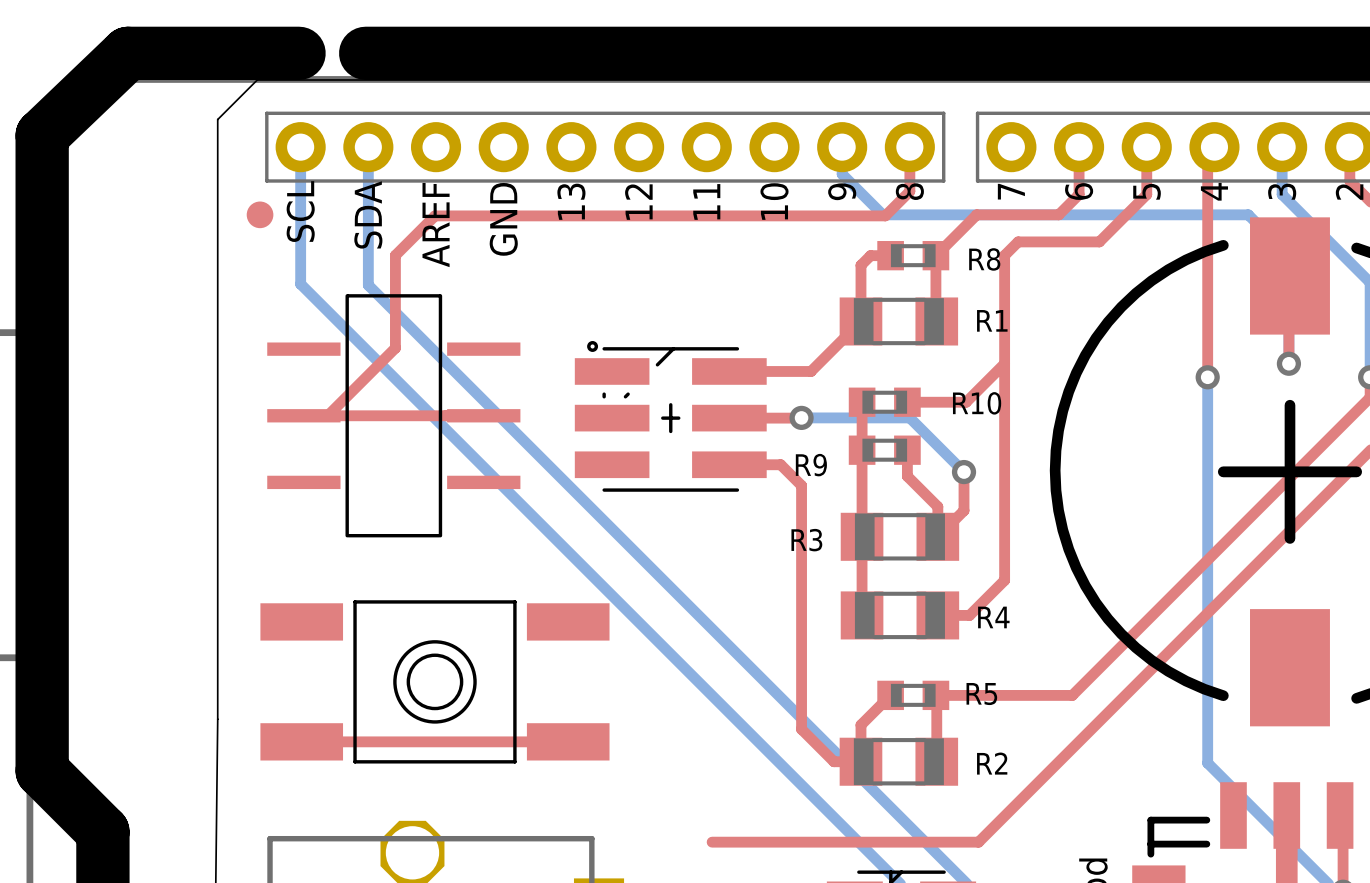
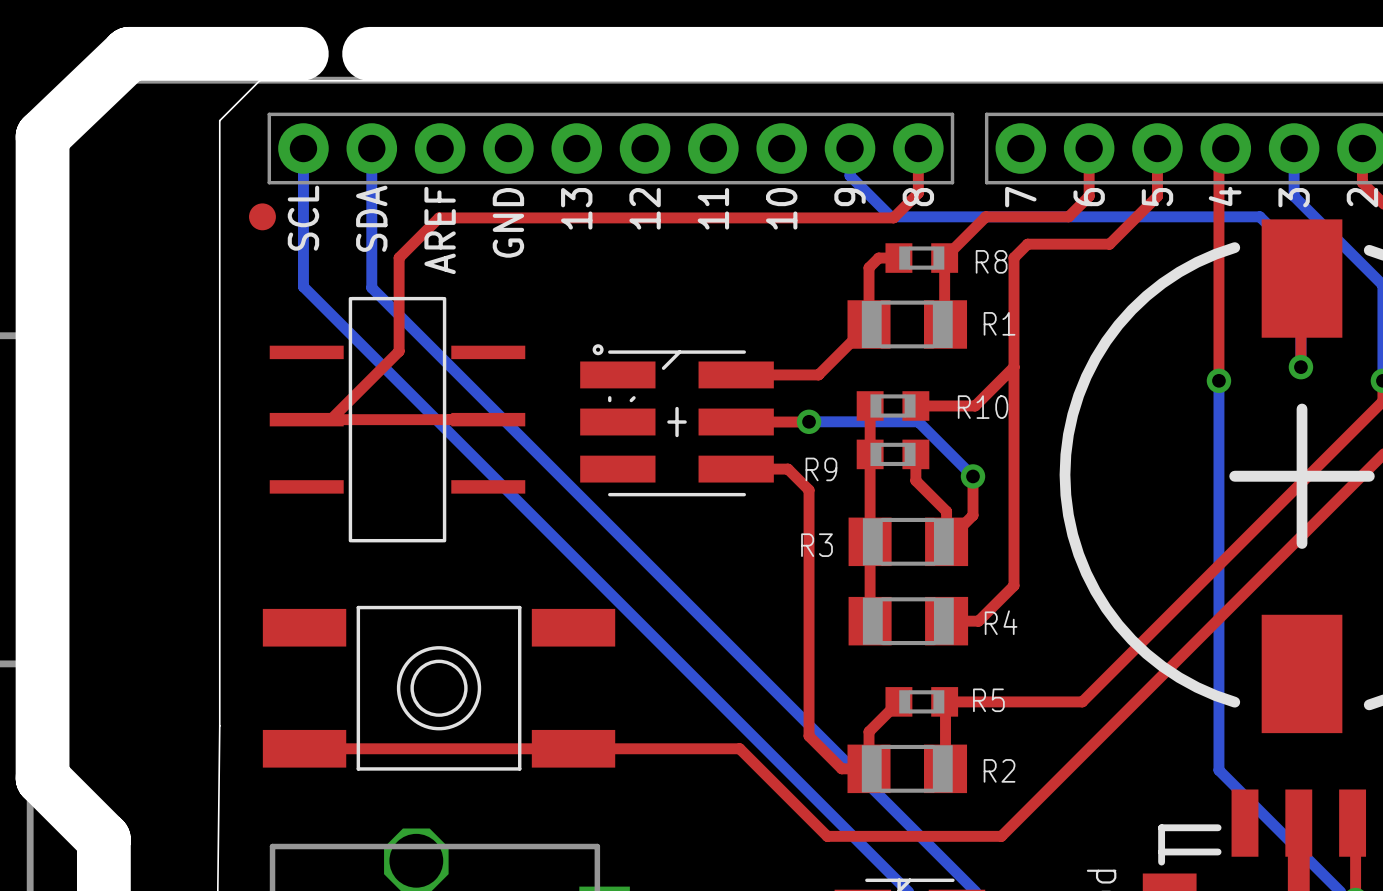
top track: (992, 828) (978, 842) (712, 842) -> (1001, 836) (827, 836) (739, 748) (573, 748)

